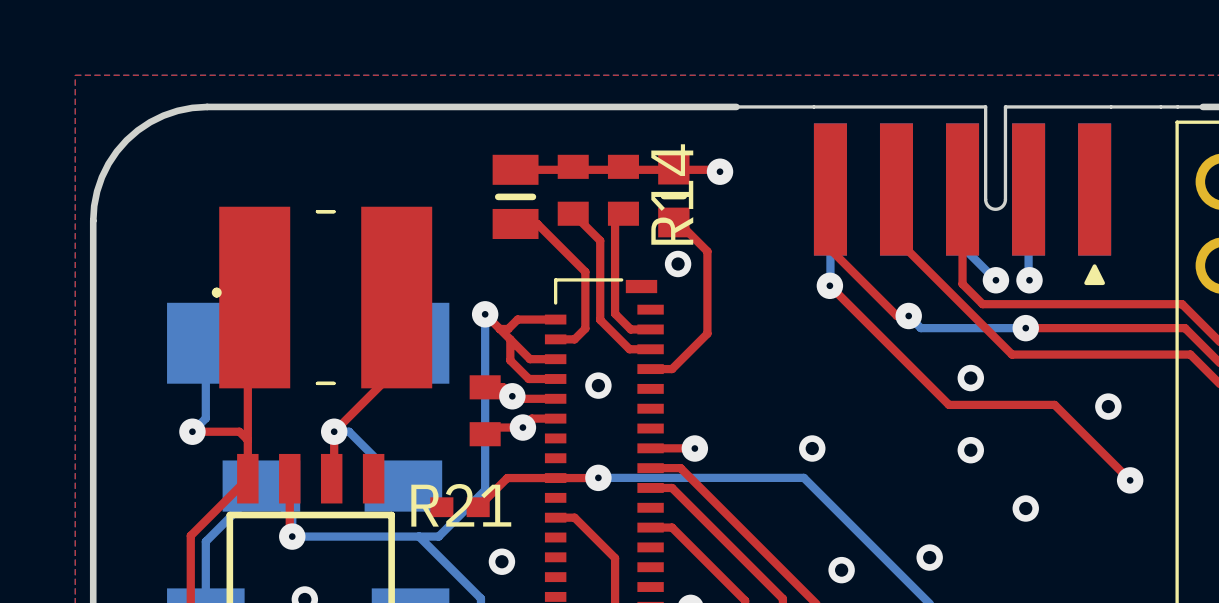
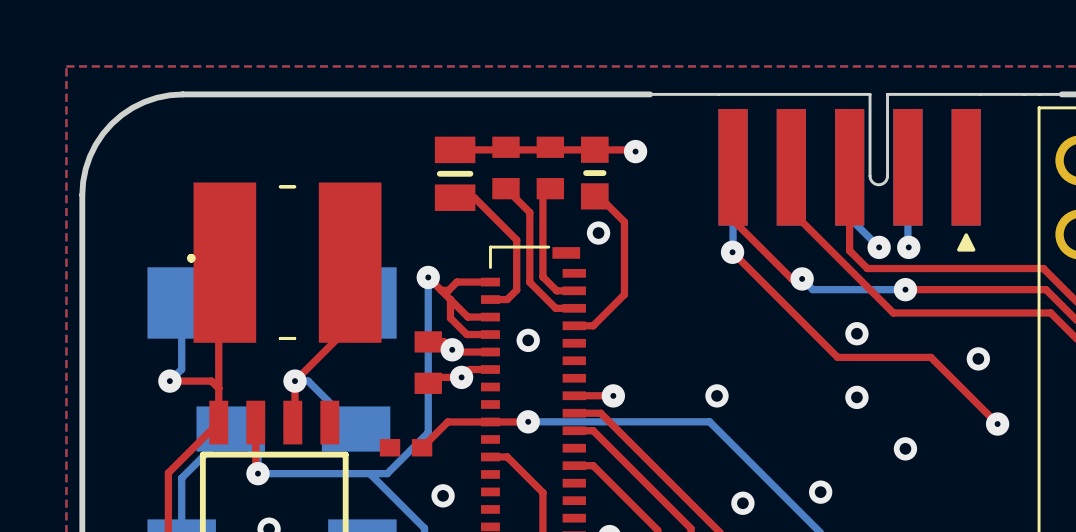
R14 name: R14 (672, 194) -> none
R21 name: R21 (461, 505) -> none

